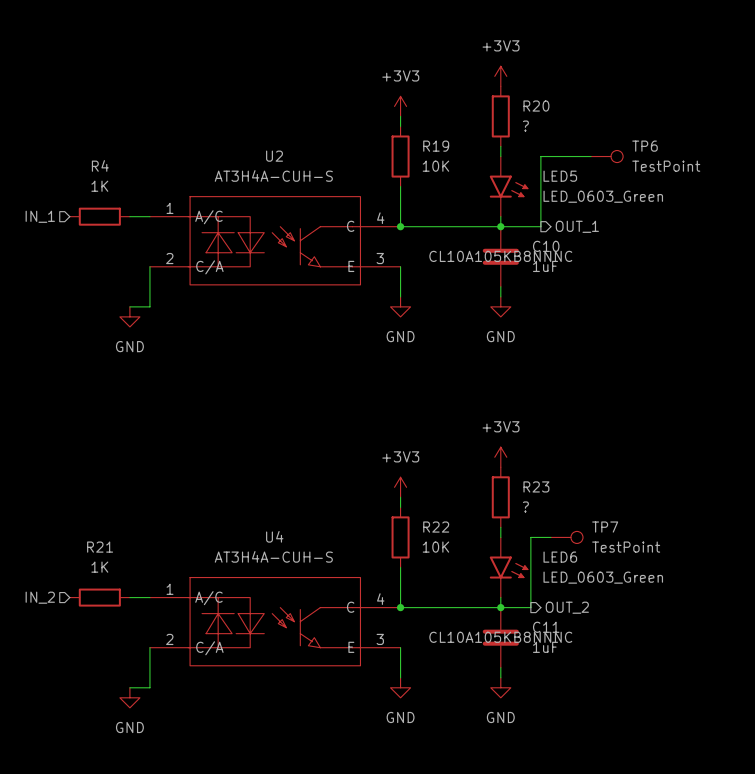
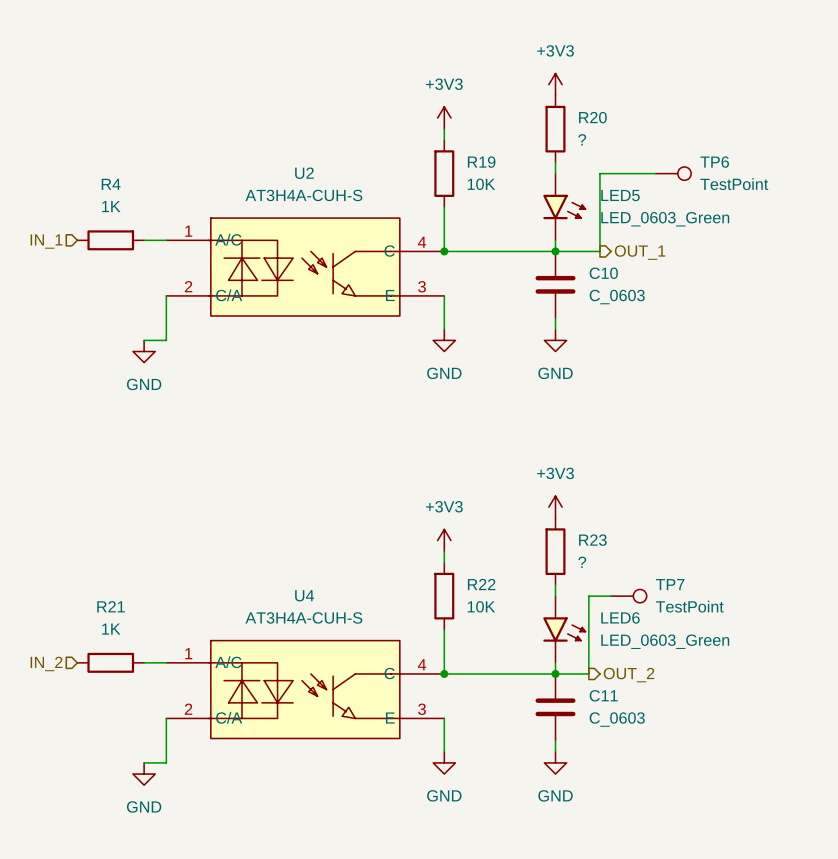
C10 text: CL10A105KB8NNNC (500, 256) -> none
C10 value: 1uF (545, 266) -> C_0603 (617, 297)
C11 text: CL10A105KB8NNNC (500, 637) -> none
C11 value: 1uF (545, 647) -> C_0603 (617, 719)

